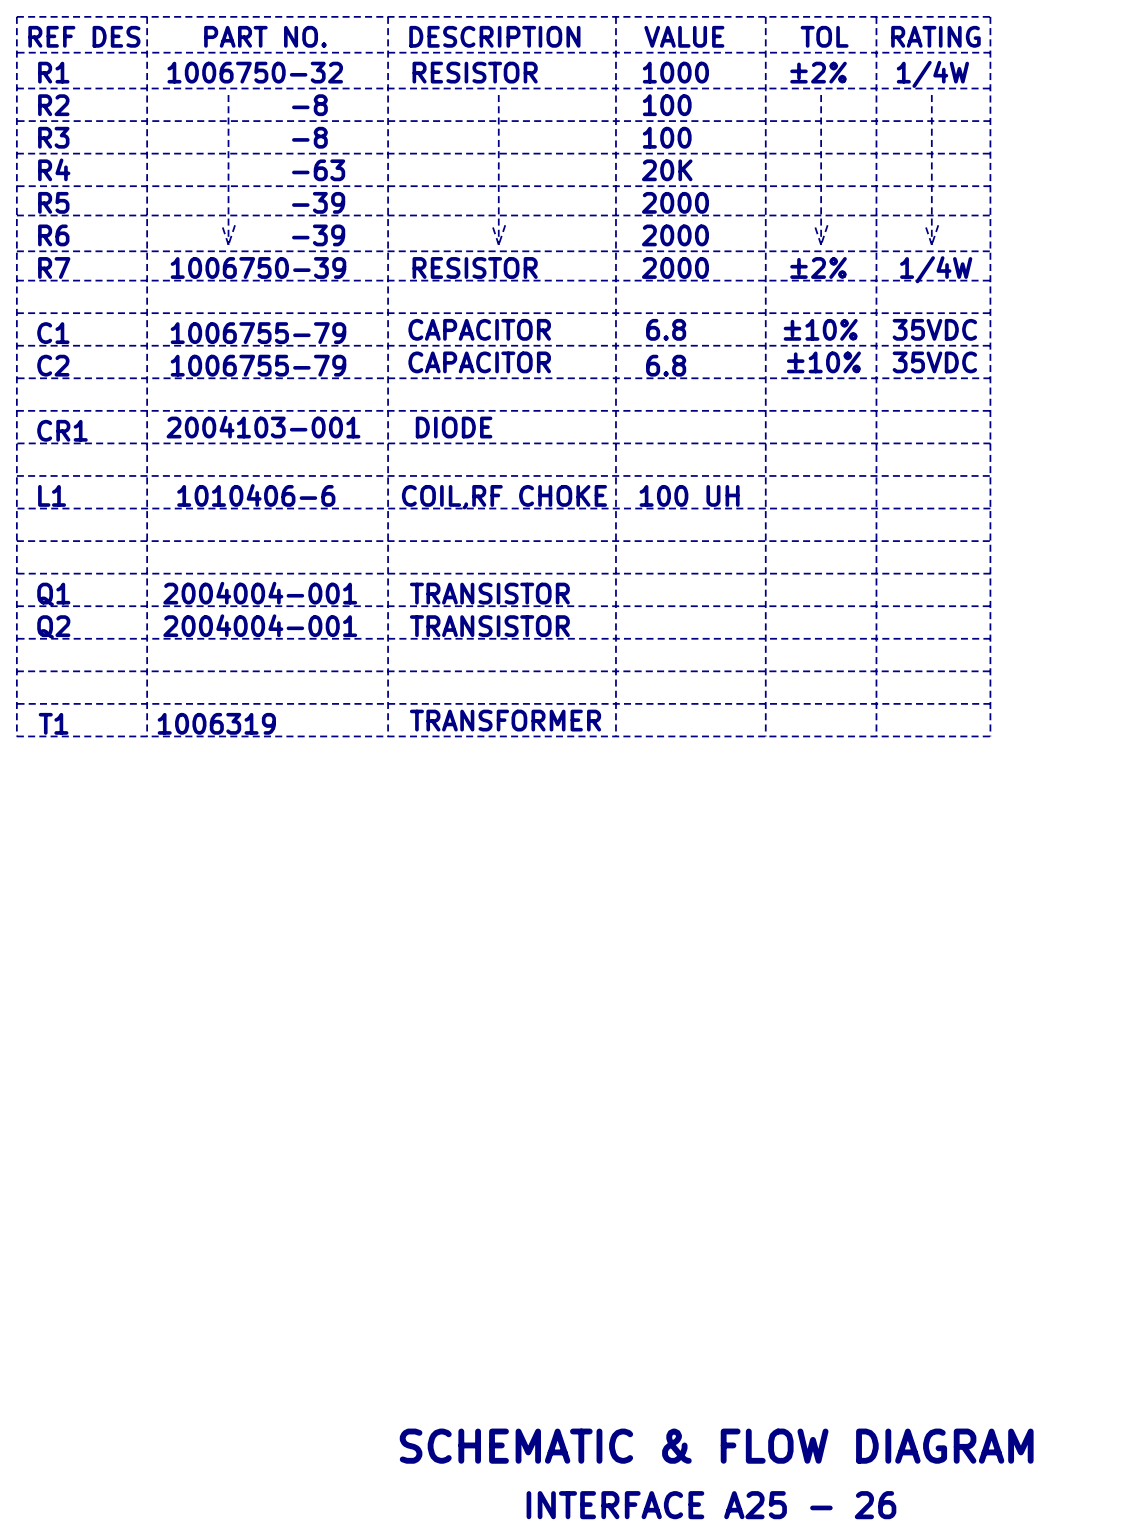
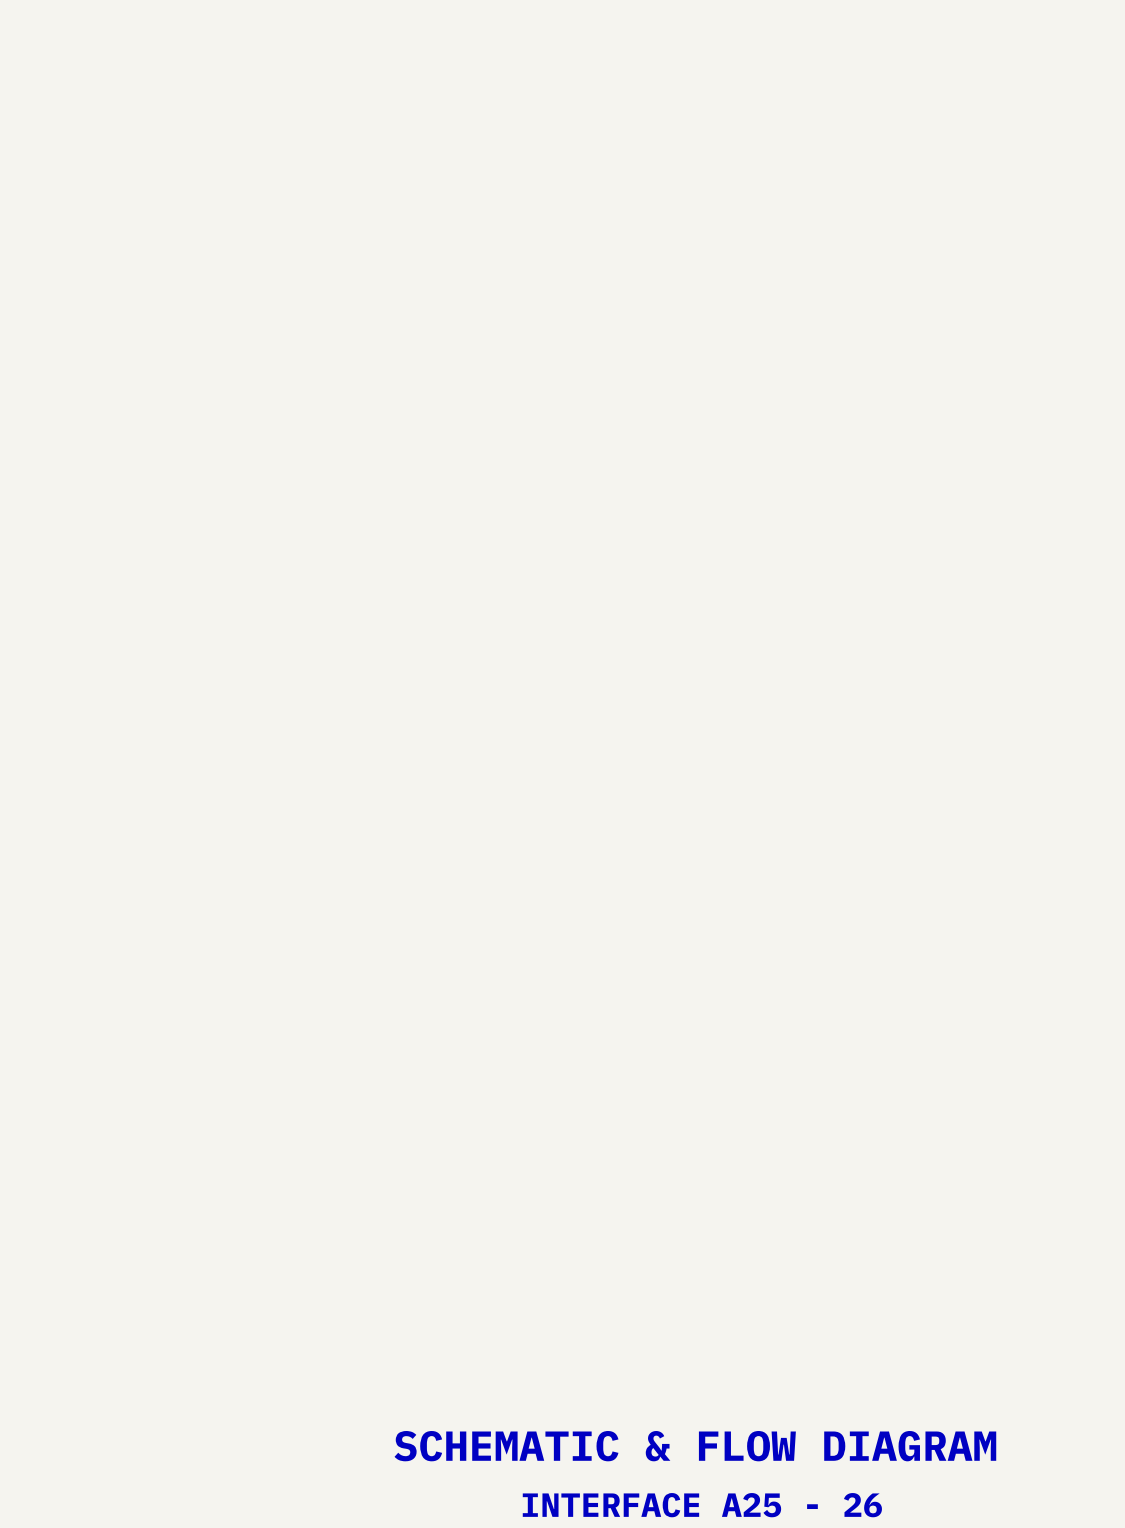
line: (16, 16) (990, 16) (990, 736) (16, 736) (16, 16) -> none
line: (147, 16) (147, 736) -> none
line: (388, 16) (388, 736) -> none
line: (615, 16) (615, 736) -> none
line: (765, 16) (765, 736) -> none
line: (876, 16) (876, 736) -> none
text: REF DES (84, 36) -> none
text: PART NO. (265, 36) -> none
text: DESCRIPTION (494, 36) -> none
text: VALUE (684, 36) -> none
text: TOL (824, 36) -> none
text: RATING (935, 36) -> none
line: (16, 52) (990, 52) -> none
text: R1 (53, 72) -> none
text: 1006750-32 (255, 72) -> none
text: RESISTOR (475, 72) -> none
text: 1000 (675, 72) -> none
text: ±2% (818, 72) -> none
text: 1/4W (932, 74) -> none
line: (16, 88) (990, 88) -> none
line: (228, 95) (228, 244) -> none
line: (498, 95) (498, 244) -> none
line: (821, 95) (821, 244) -> none
line: (931, 95) (931, 244) -> none
text: R2 (53, 105) -> none
text: -8 (309, 105) -> none
text: 100 (667, 105) -> none
line: (16, 121) (990, 121) -> none
text: R3 (53, 137) -> none
text: -8 (309, 137) -> none
text: 100 (667, 137) -> none
line: (16, 153) (990, 153) -> none
text: R4 (54, 169) -> none
text: -63 (318, 170) -> none
text: 20K (667, 170) -> none
line: (16, 186) (990, 186) -> none
text: R5 (53, 202) -> none
text: -39 (318, 202) -> none
text: 2000 (675, 202) -> none
line: (16, 215) (990, 215) -> none
line: (222, 225) (228, 244) -> none
line: (235, 225) (228, 244) -> none
line: (492, 225) (498, 244) -> none
line: (505, 225) (498, 244) -> none
line: (814, 225) (821, 244) -> none
line: (827, 225) (821, 244) -> none
line: (925, 225) (931, 244) -> none
line: (938, 225) (931, 244) -> none
text: R6 (53, 235) -> none
text: -39 (318, 235) -> none
text: 2000 (675, 235) -> none
line: (16, 251) (990, 251) -> none
text: R7 (54, 267) -> none
text: 1006750-39 (258, 267) -> none
text: RESISTOR (475, 267) -> none
text: 2000 (675, 267) -> none
text: ±2% (818, 267) -> none
text: 1/4W (936, 269) -> none
line: (16, 280) (990, 280) -> none
line: (16, 313) (990, 313) -> none
text: CAPACITOR (479, 329) -> none
text: 6.8 (666, 329) -> none
text: ±10% (820, 329) -> none
text: 35VDC (934, 329) -> none
text: C1 (53, 333) -> none
text: 1006755-79 (258, 333) -> none
line: (16, 345) (990, 345) -> none
text: CAPACITOR (479, 362) -> none
text: ±10% (823, 362) -> none
text: 35VDC (934, 362) -> none
text: C2 (53, 365) -> none
text: 1006755-79 (258, 365) -> none
text: 6.8 (666, 365) -> none
line: (16, 378) (990, 378) -> none
line: (16, 410) (990, 410) -> none
text: 2004103-001 (263, 427) -> none
text: DIODE (454, 427) -> none
text: CR1 (62, 430) -> none
line: (16, 443) (990, 443) -> none
line: (16, 475) (990, 475) -> none
text: L1 (52, 495) -> none
text: 1010406-6 (256, 495) -> none
text: 100 UH (689, 495) -> none
text: COIL,RF CHOKE (504, 497) -> none
line: (16, 508) (990, 508) -> none
line: (16, 541) (990, 541) -> none
line: (16, 573) (990, 573) -> none
text: 2004004-001 (260, 593) -> none
text: TRANSISTOR (489, 593) -> none
text: Q1 (53, 594) -> none
line: (16, 606) (990, 606) -> none
text: 2004004-001 (260, 625) -> none
text: TRANSISTOR (489, 626) -> none
text: Q2 (53, 627) -> none
line: (16, 638) (990, 638) -> none
line: (16, 671) (990, 671) -> none
line: (16, 703) (990, 703) -> none
text: TRANSFORMER (505, 720) -> none
text: T1 (53, 723) -> none
text: 1006319 (216, 723) -> none

